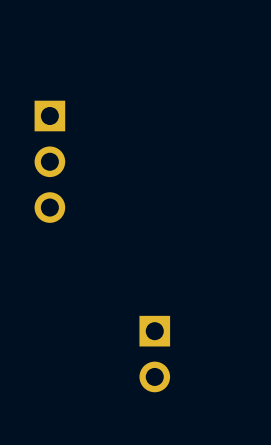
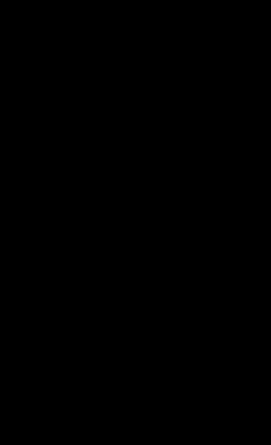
part: (49, 161) -> none
part: (154, 354) -> none

